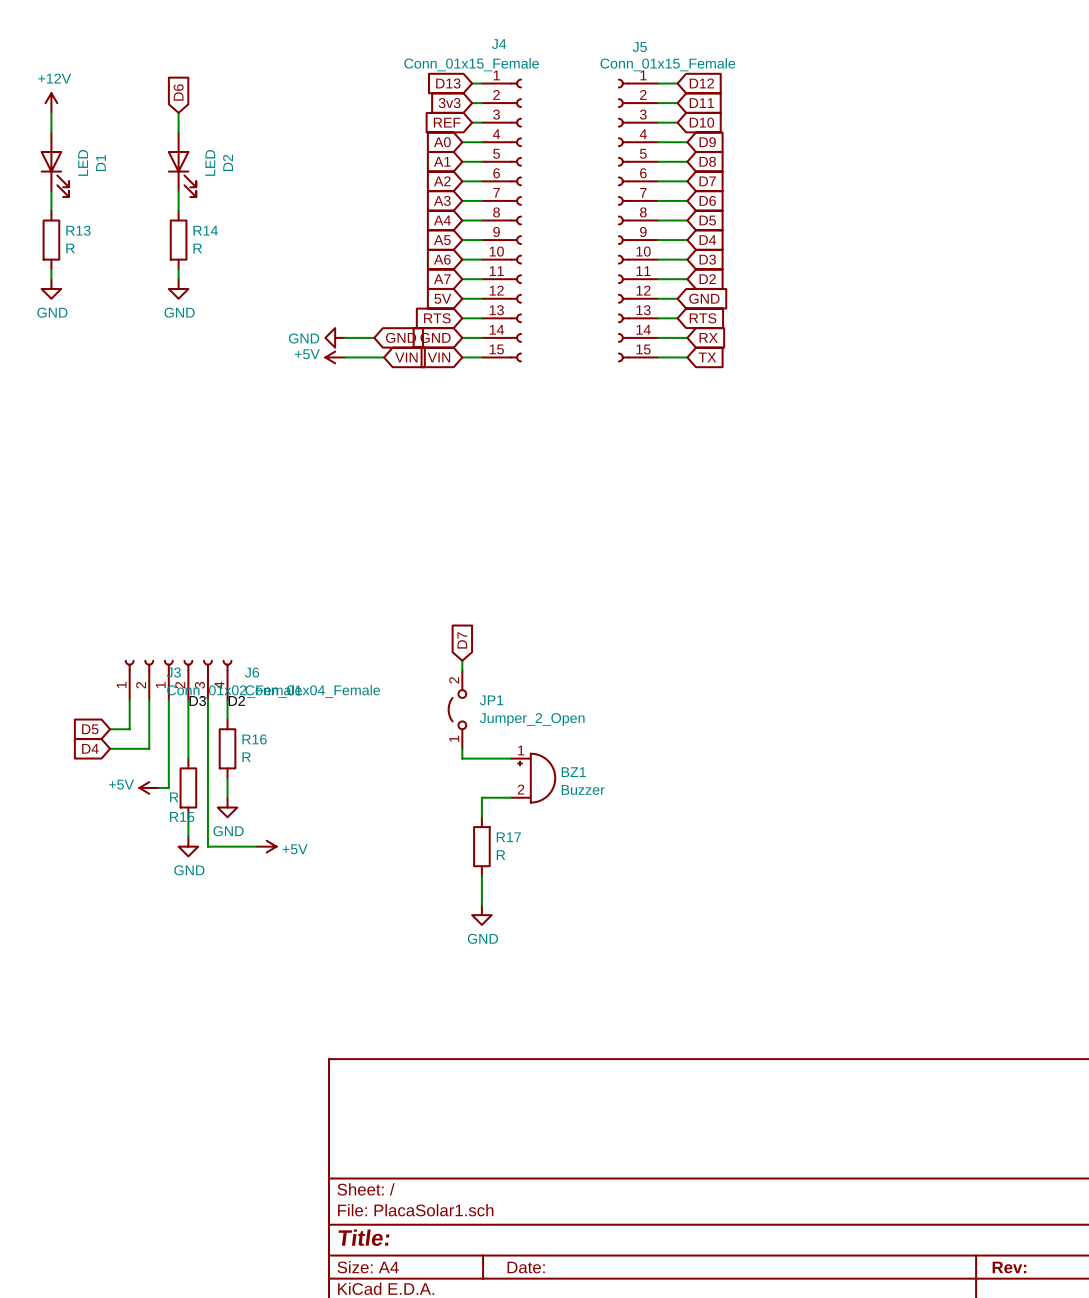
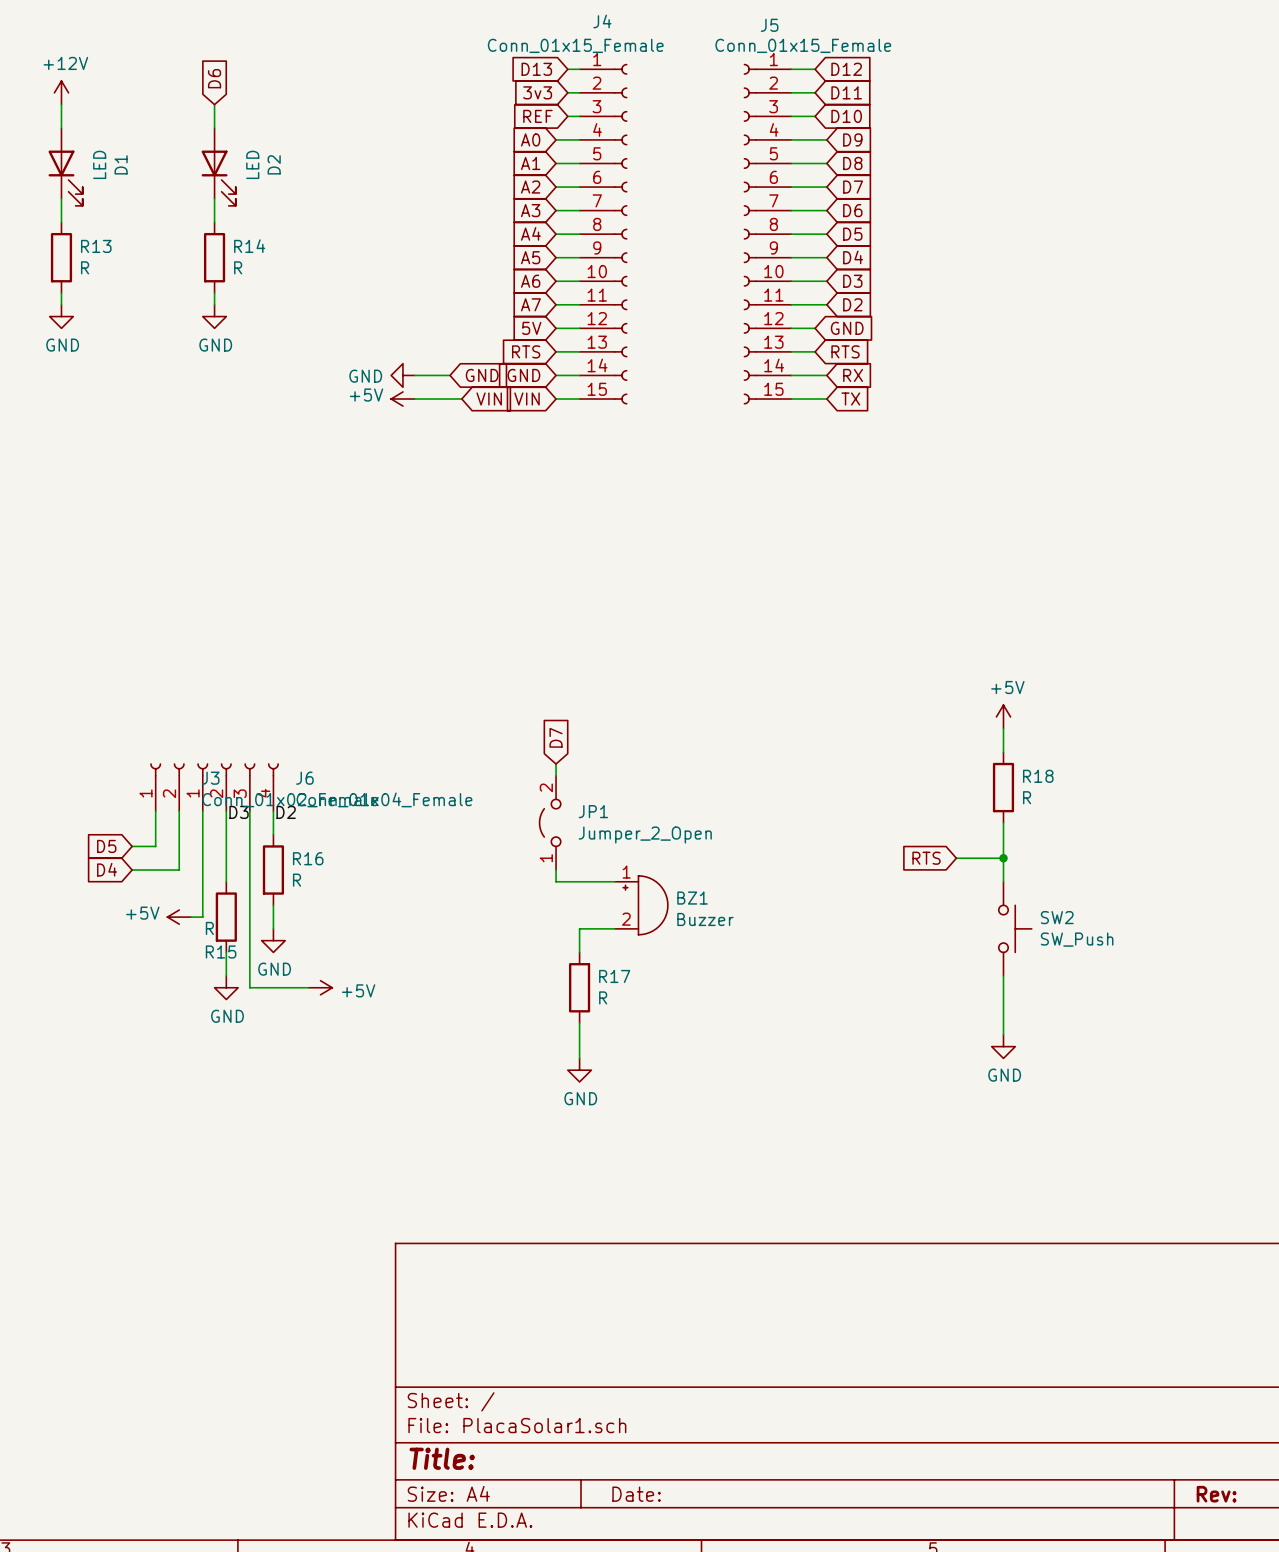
power symbol: none -> +5V (1003, 716)
wire: none -> (1003, 728) (1003, 752)
R18: none -> R (1003, 787)
wire: none -> (1003, 822) (1003, 881)
global label: none -> RTS (926, 858)
wire: none -> (956, 858) (1003, 858)
junction: none -> (1003, 858)
SW2: none -> SW_Push (1015, 928)
wire: none -> (1003, 975) (1003, 1034)
power symbol: none -> GND (1003, 1046)

